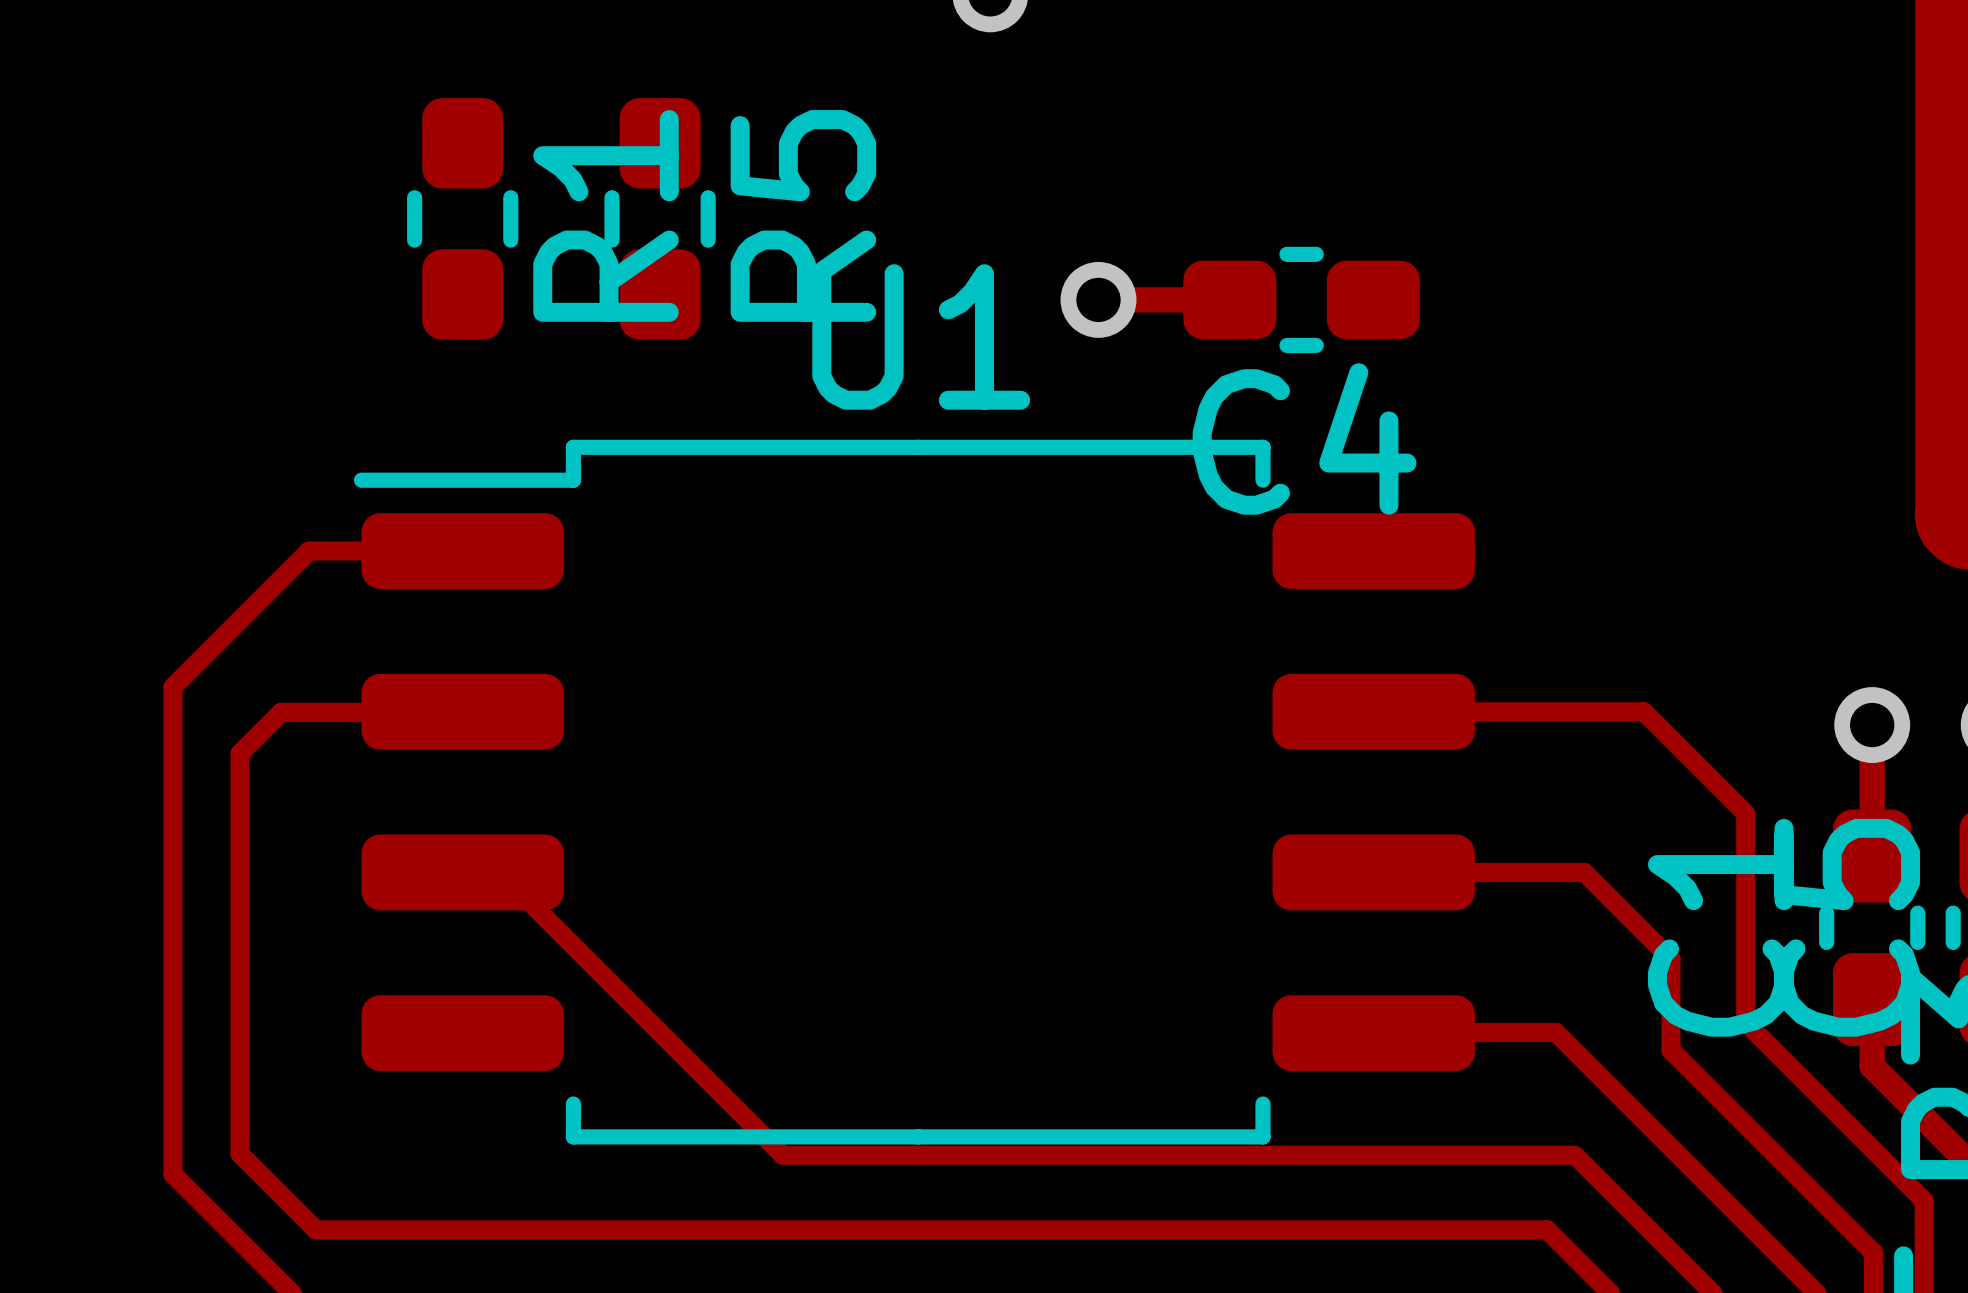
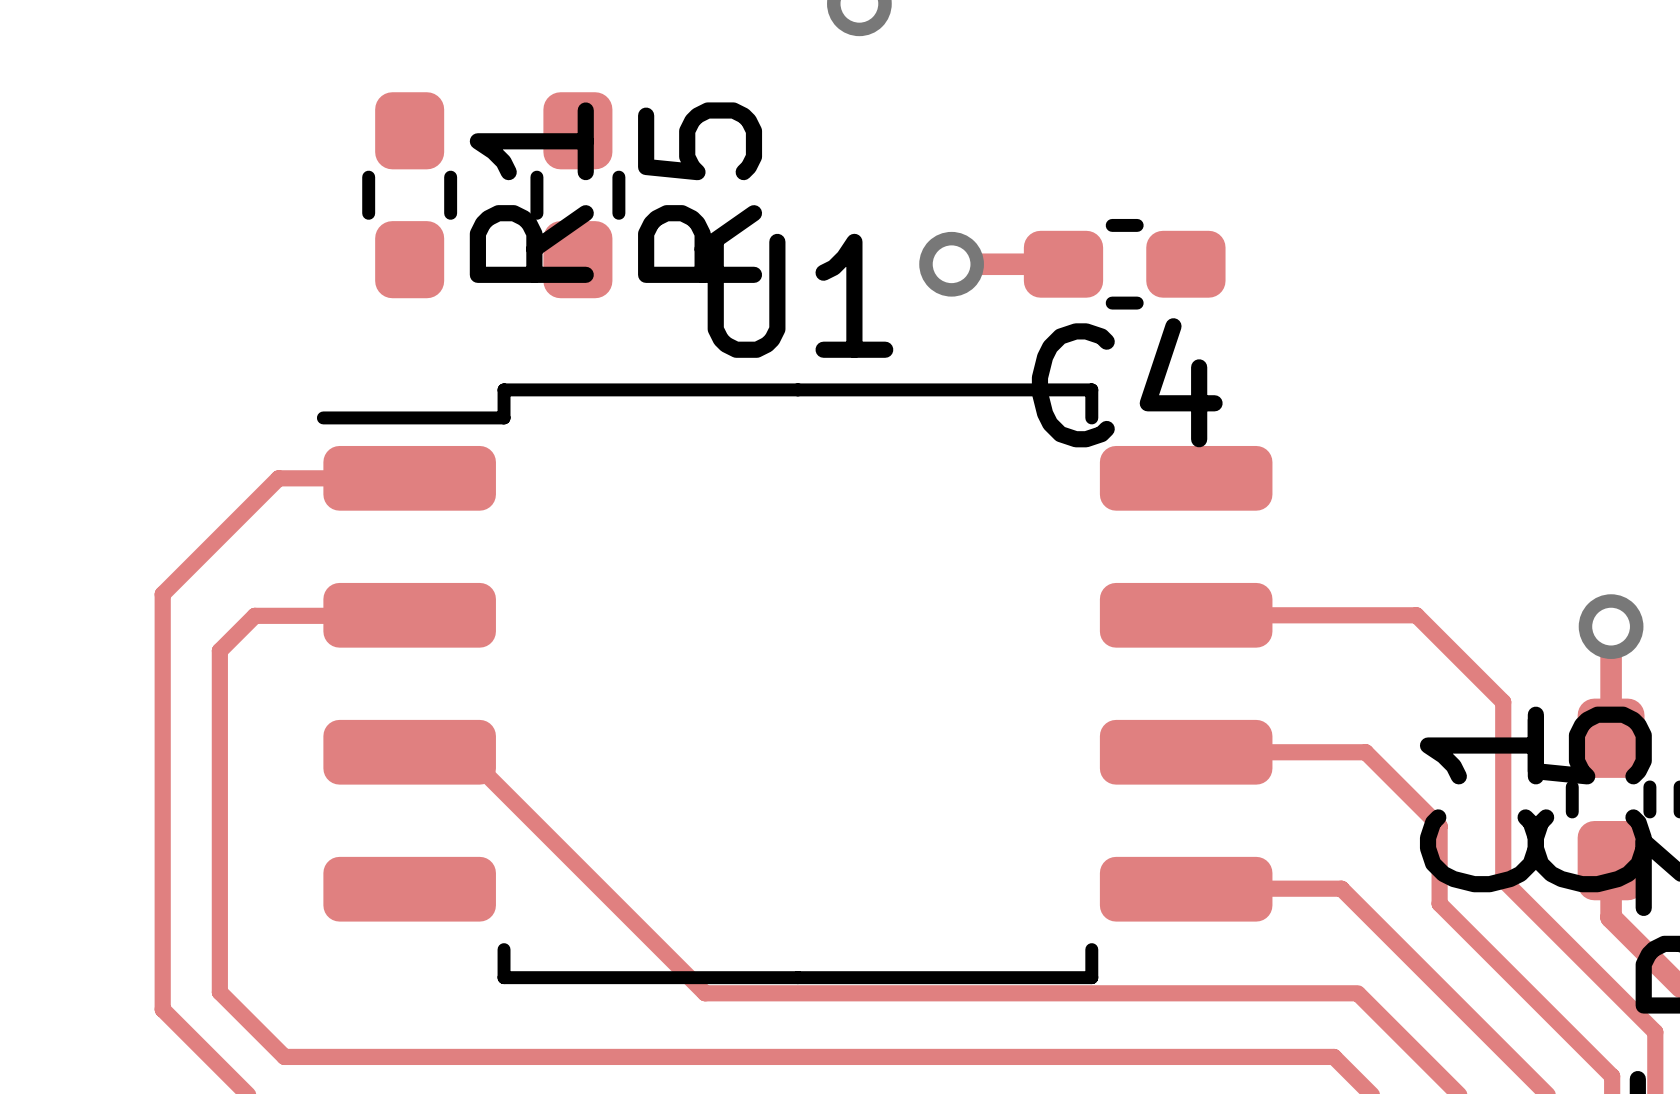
track: (500, 872) (782, 1155) (809, 1155) -> (441, 752) (464, 752) (705, 993)

